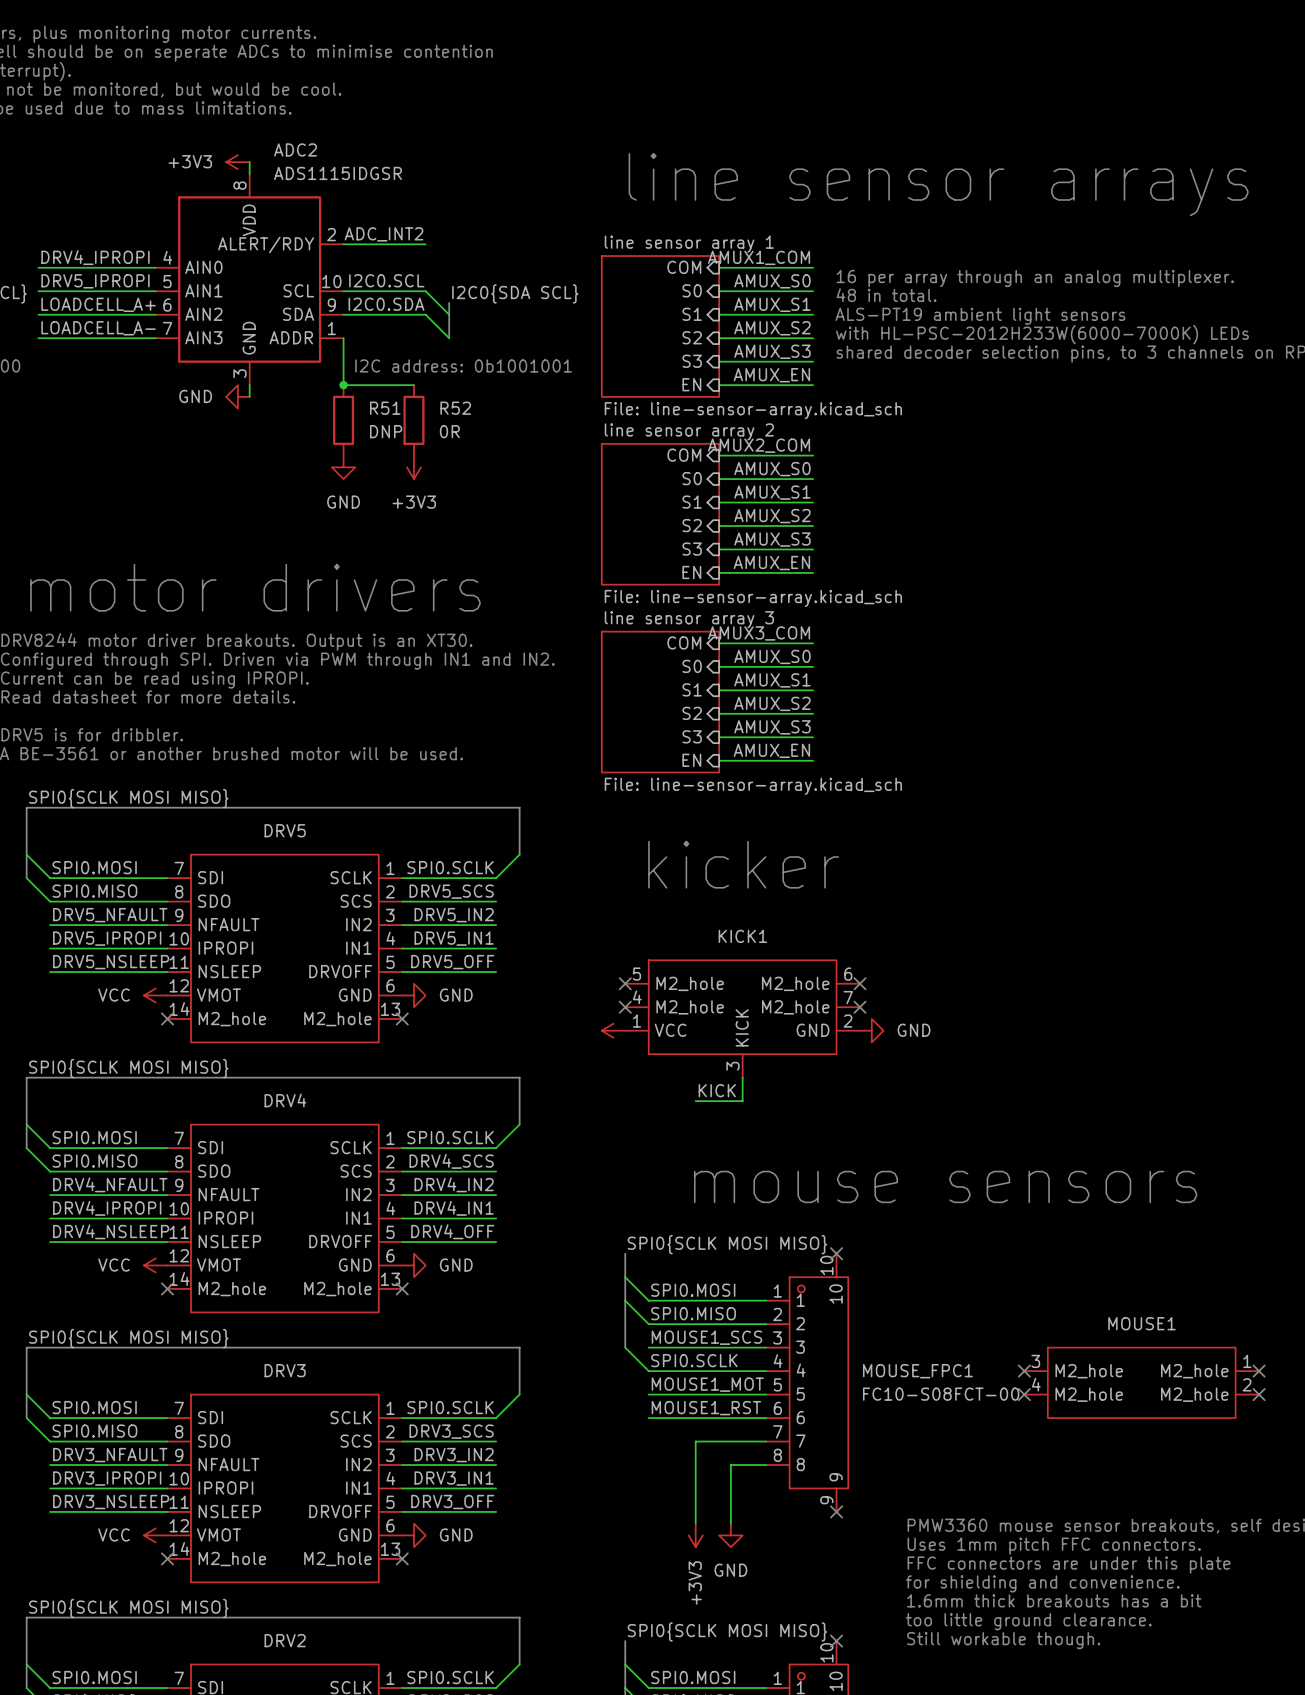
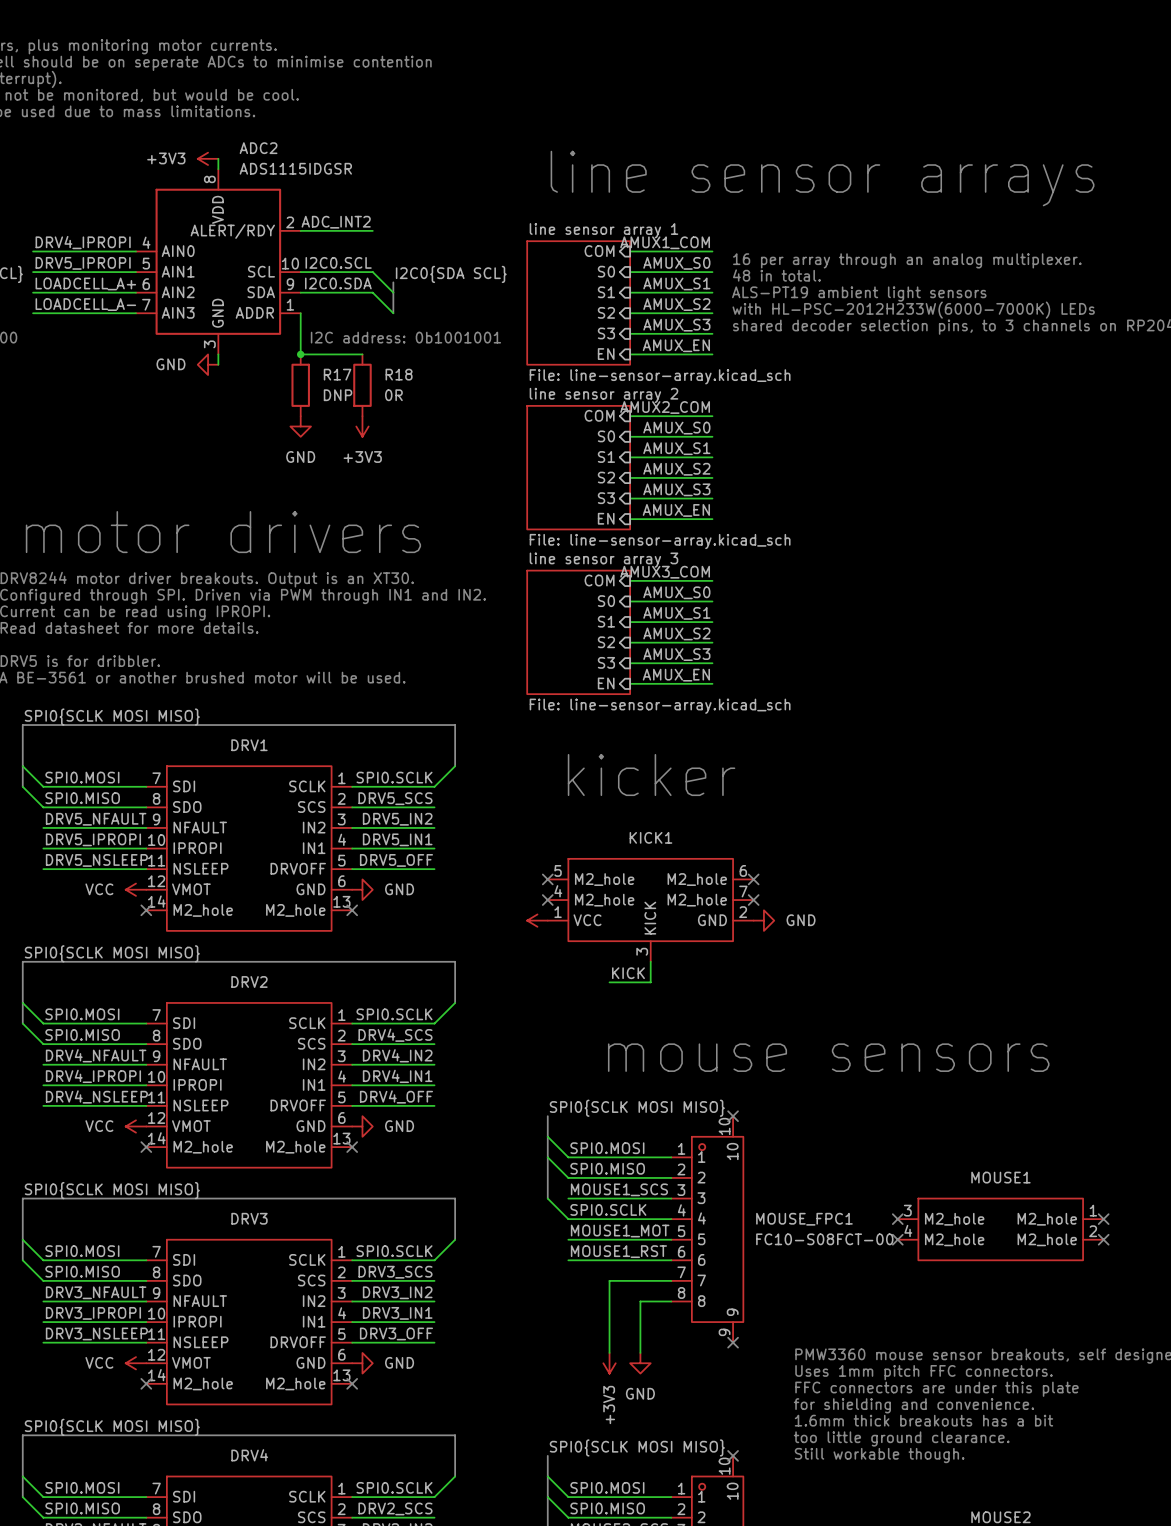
R51 name: R51 (385, 408) -> R17 (337, 374)
R52 name: R52 (455, 408) -> R18 (399, 374)
DRV5 name: DRV5 (285, 830) -> DRV1 (249, 745)
DRV4 name: DRV4 (285, 1100) -> DRV2 (249, 981)
DRV2 name: DRV2 (285, 1640) -> DRV4 (249, 1455)

